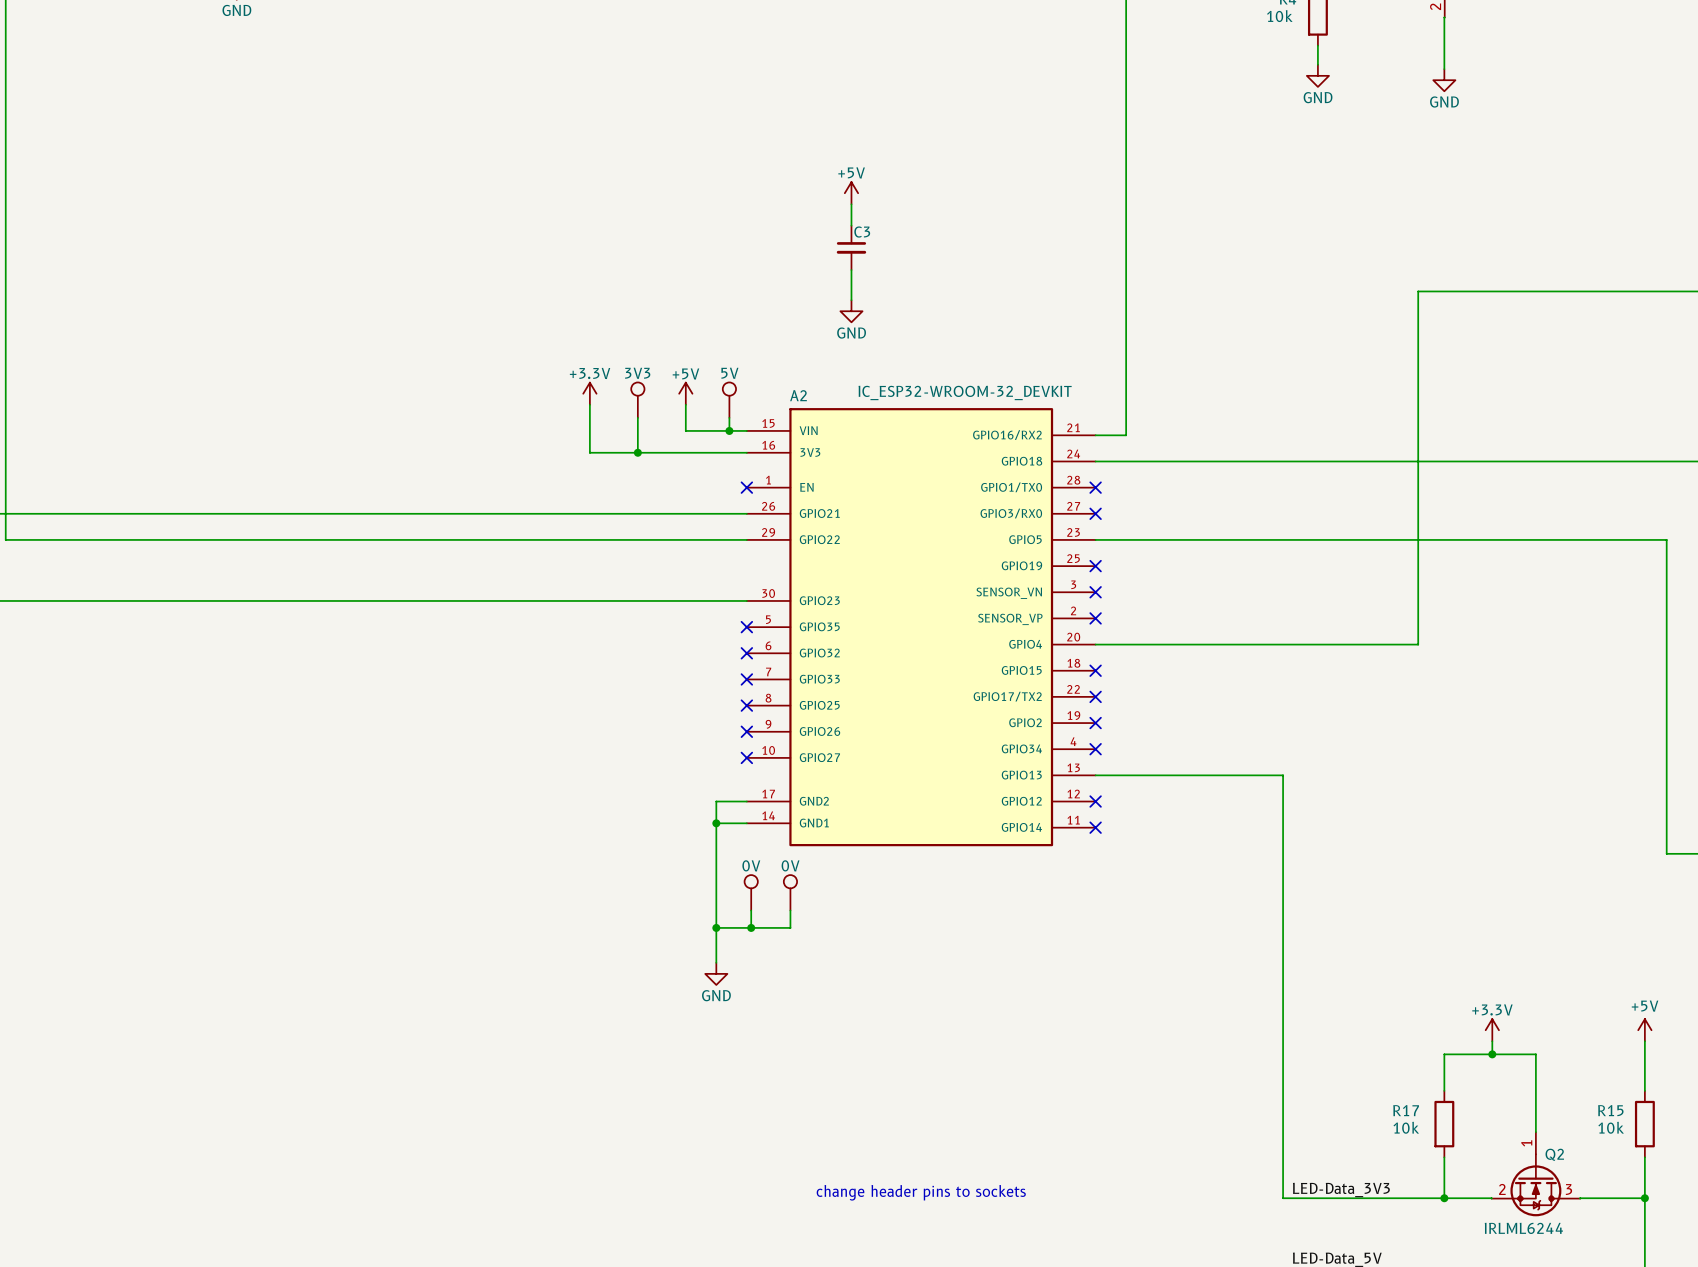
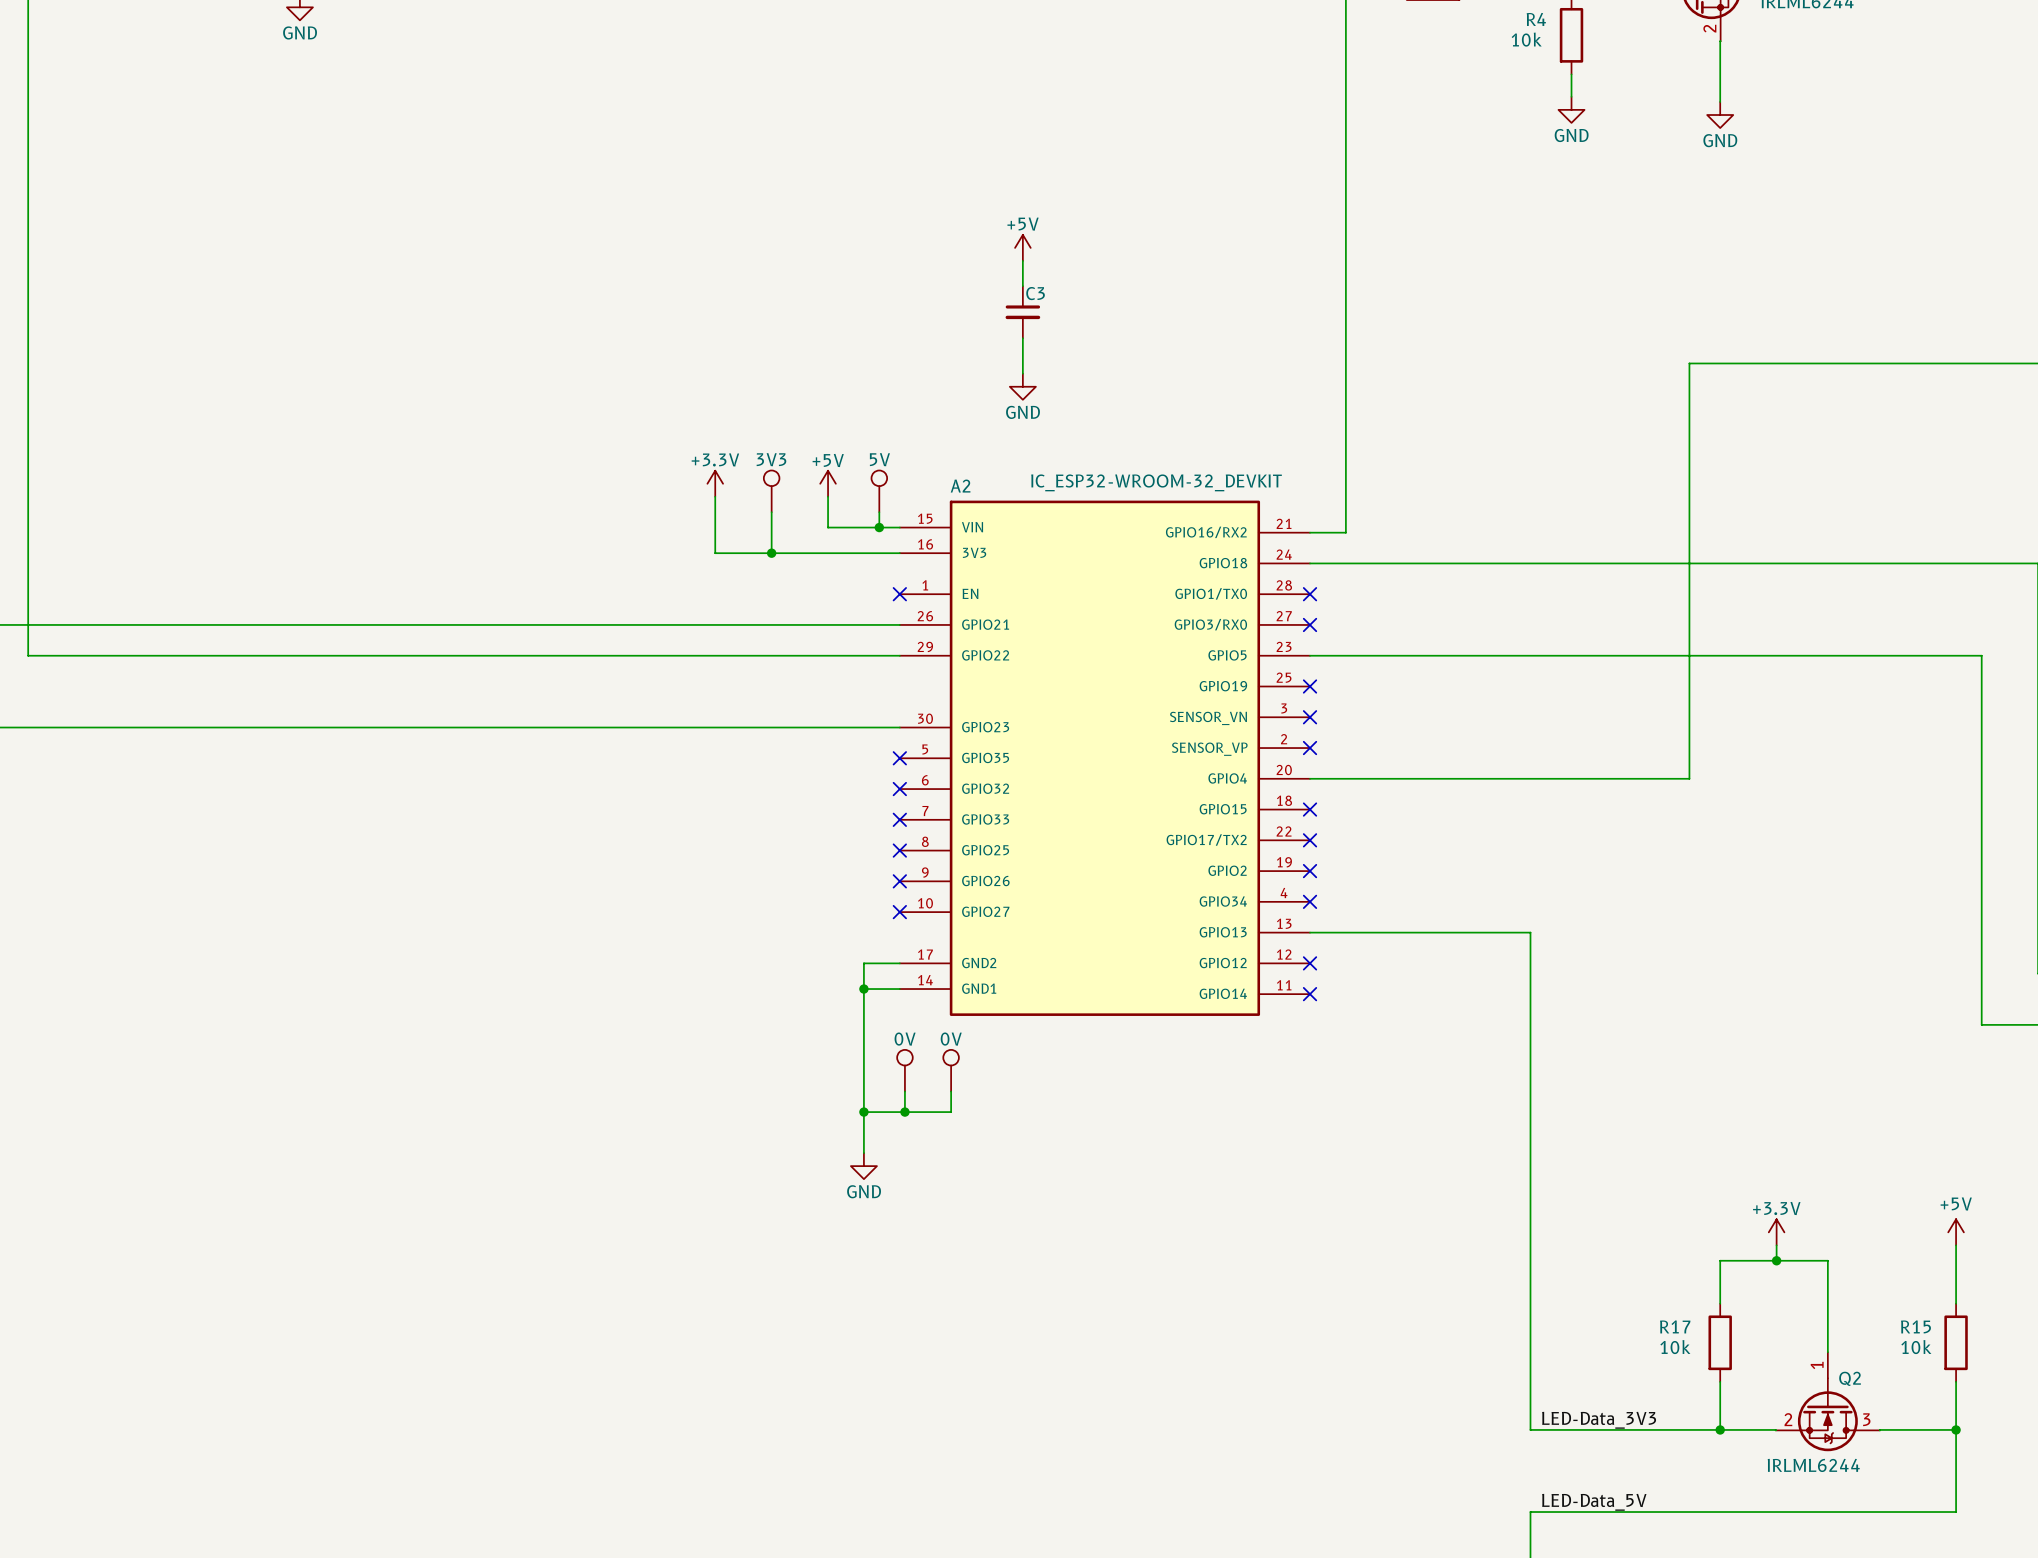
text: change header pins to sockets (921, 1192) -> none

